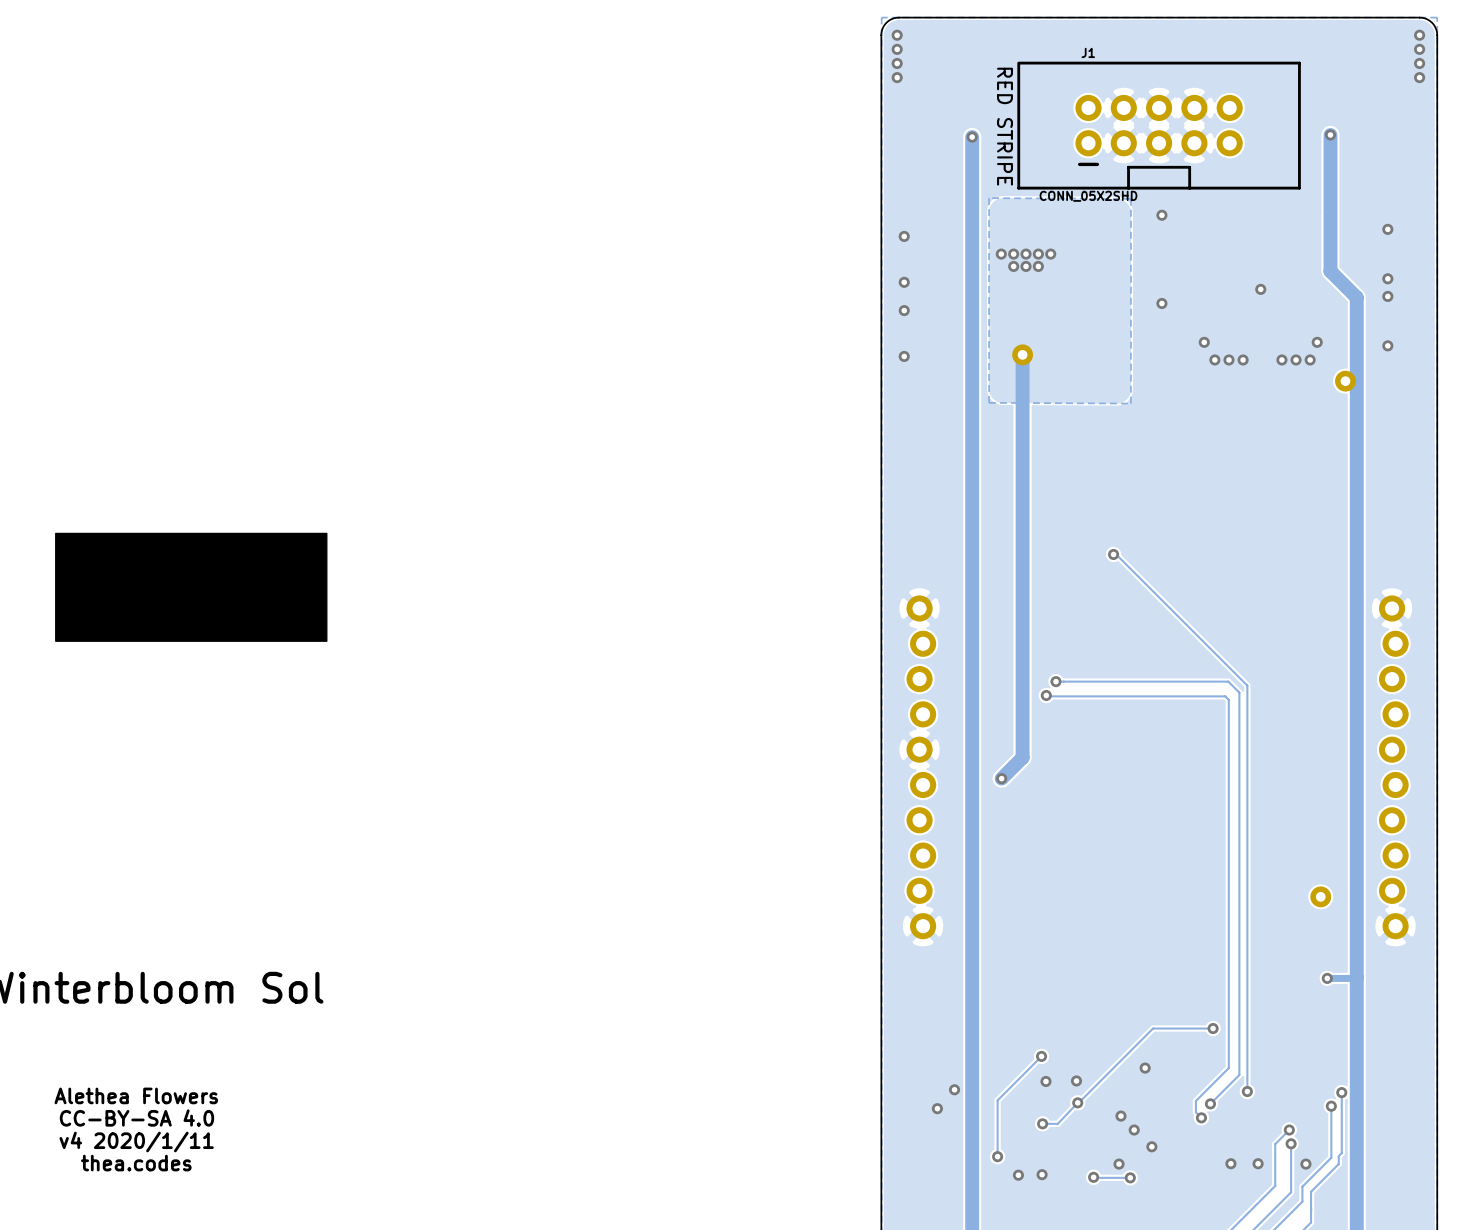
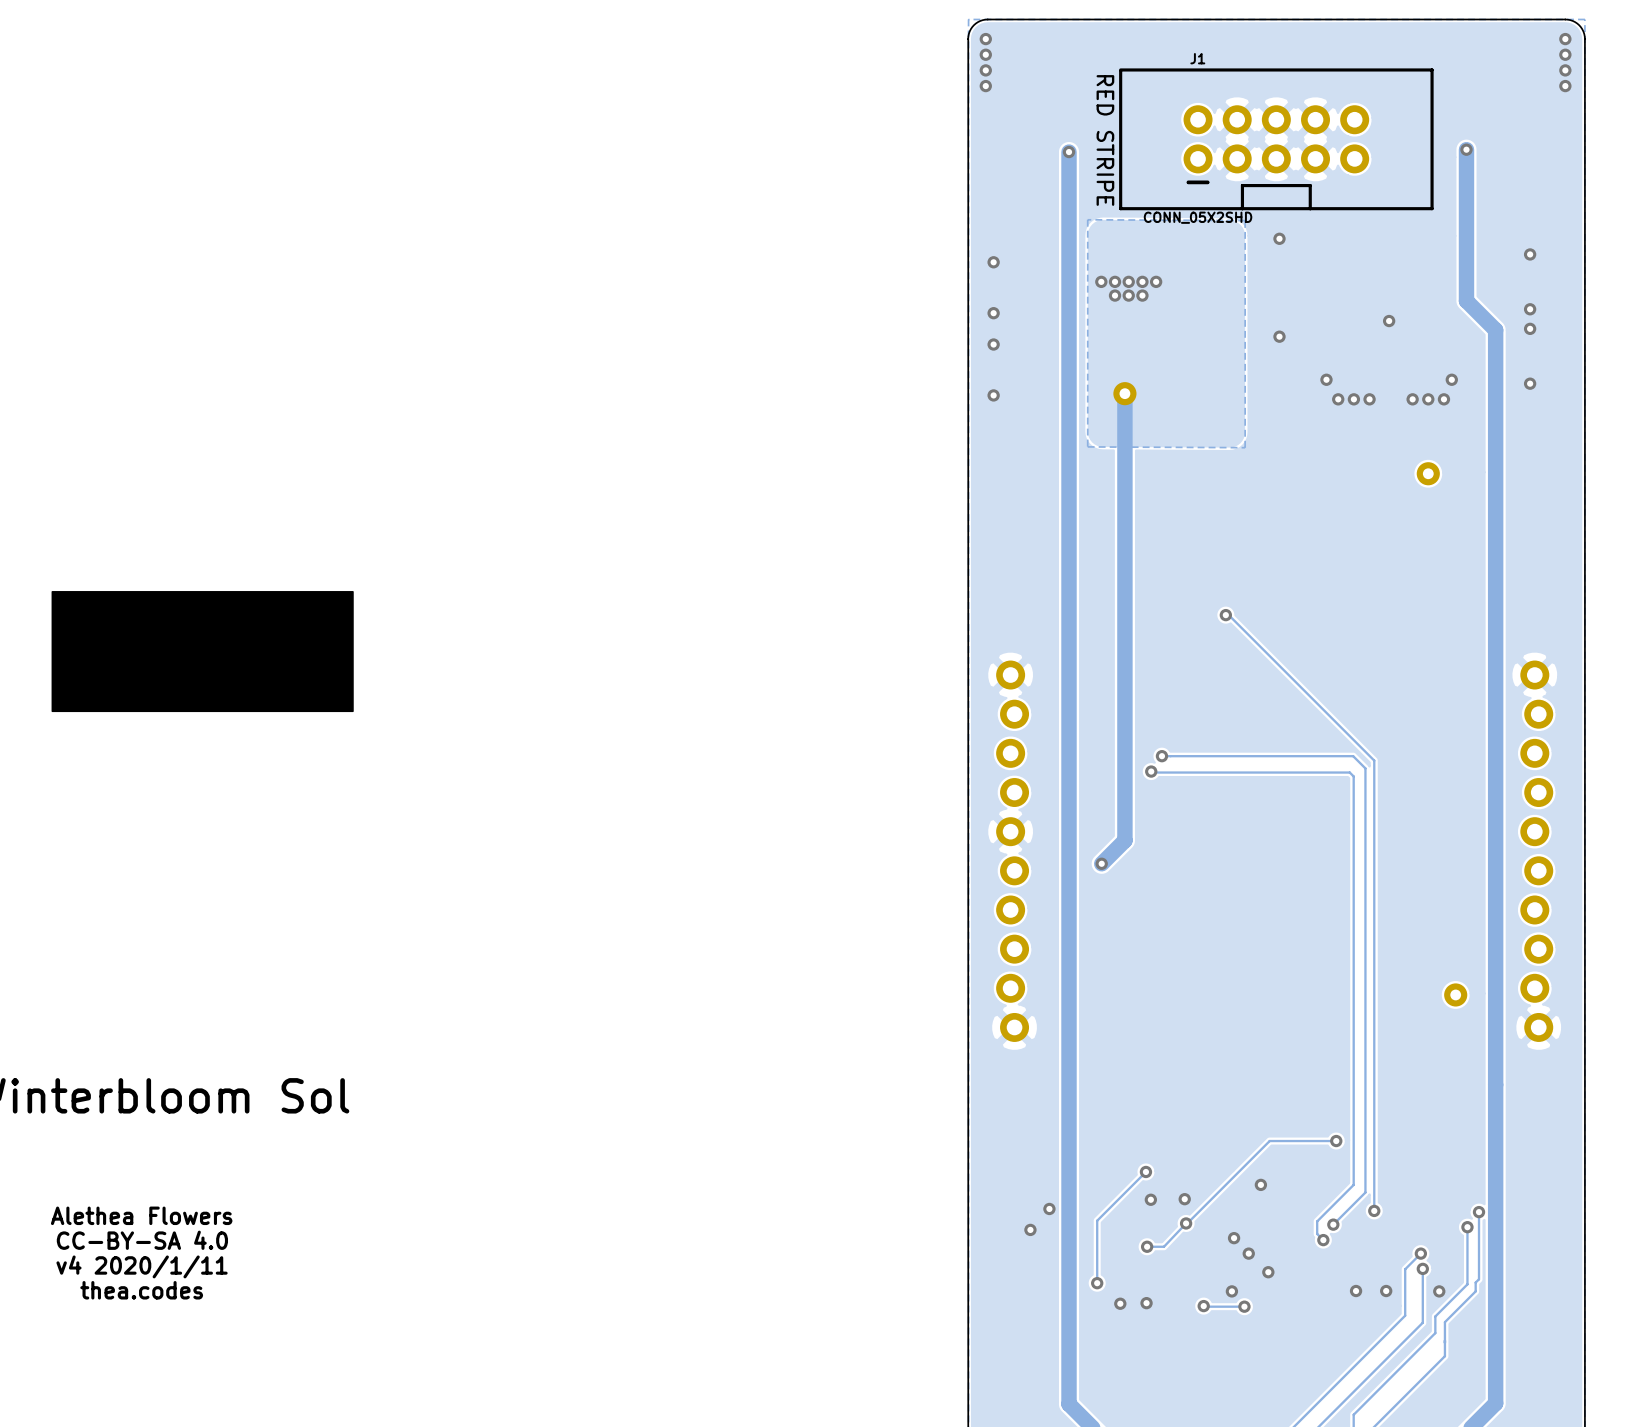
part position: (1345, 381) -> (1428, 473)
via: (1327, 978) -> none
track: (1356, 978) (1327, 978) -> none

